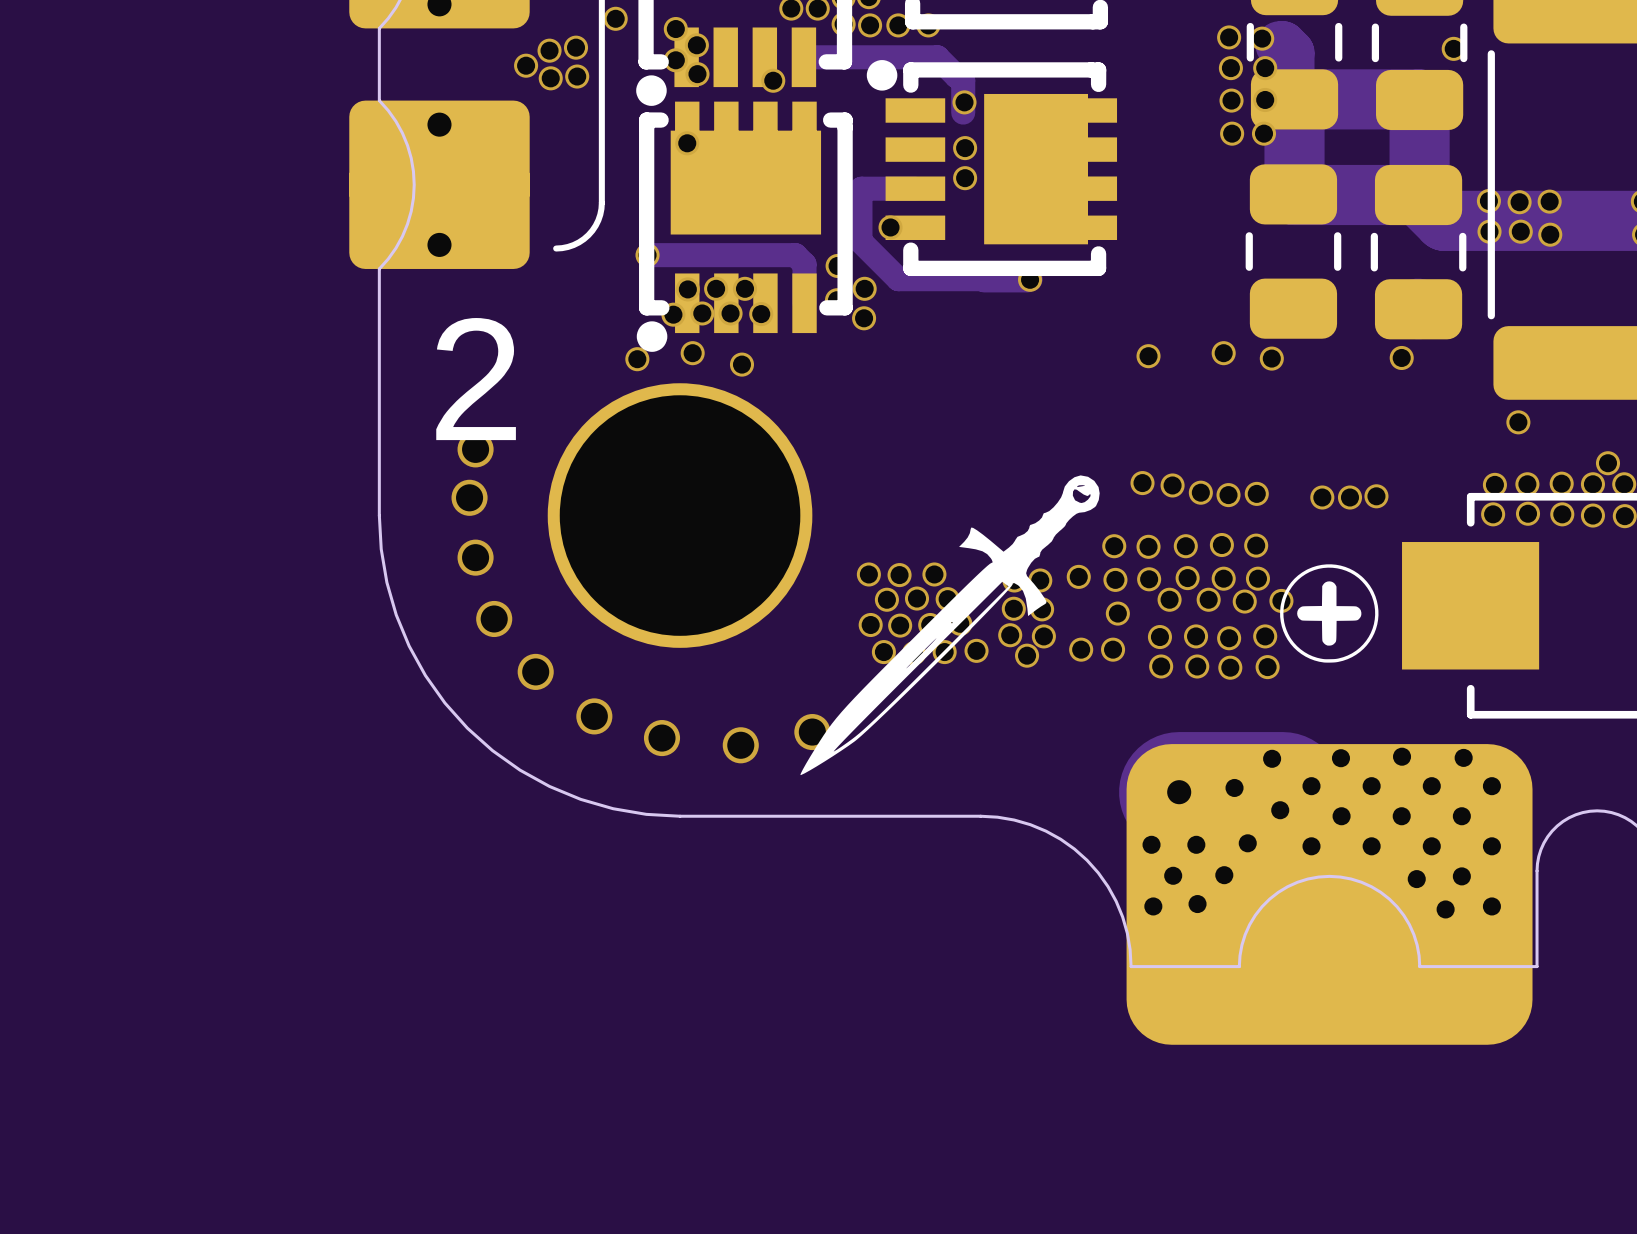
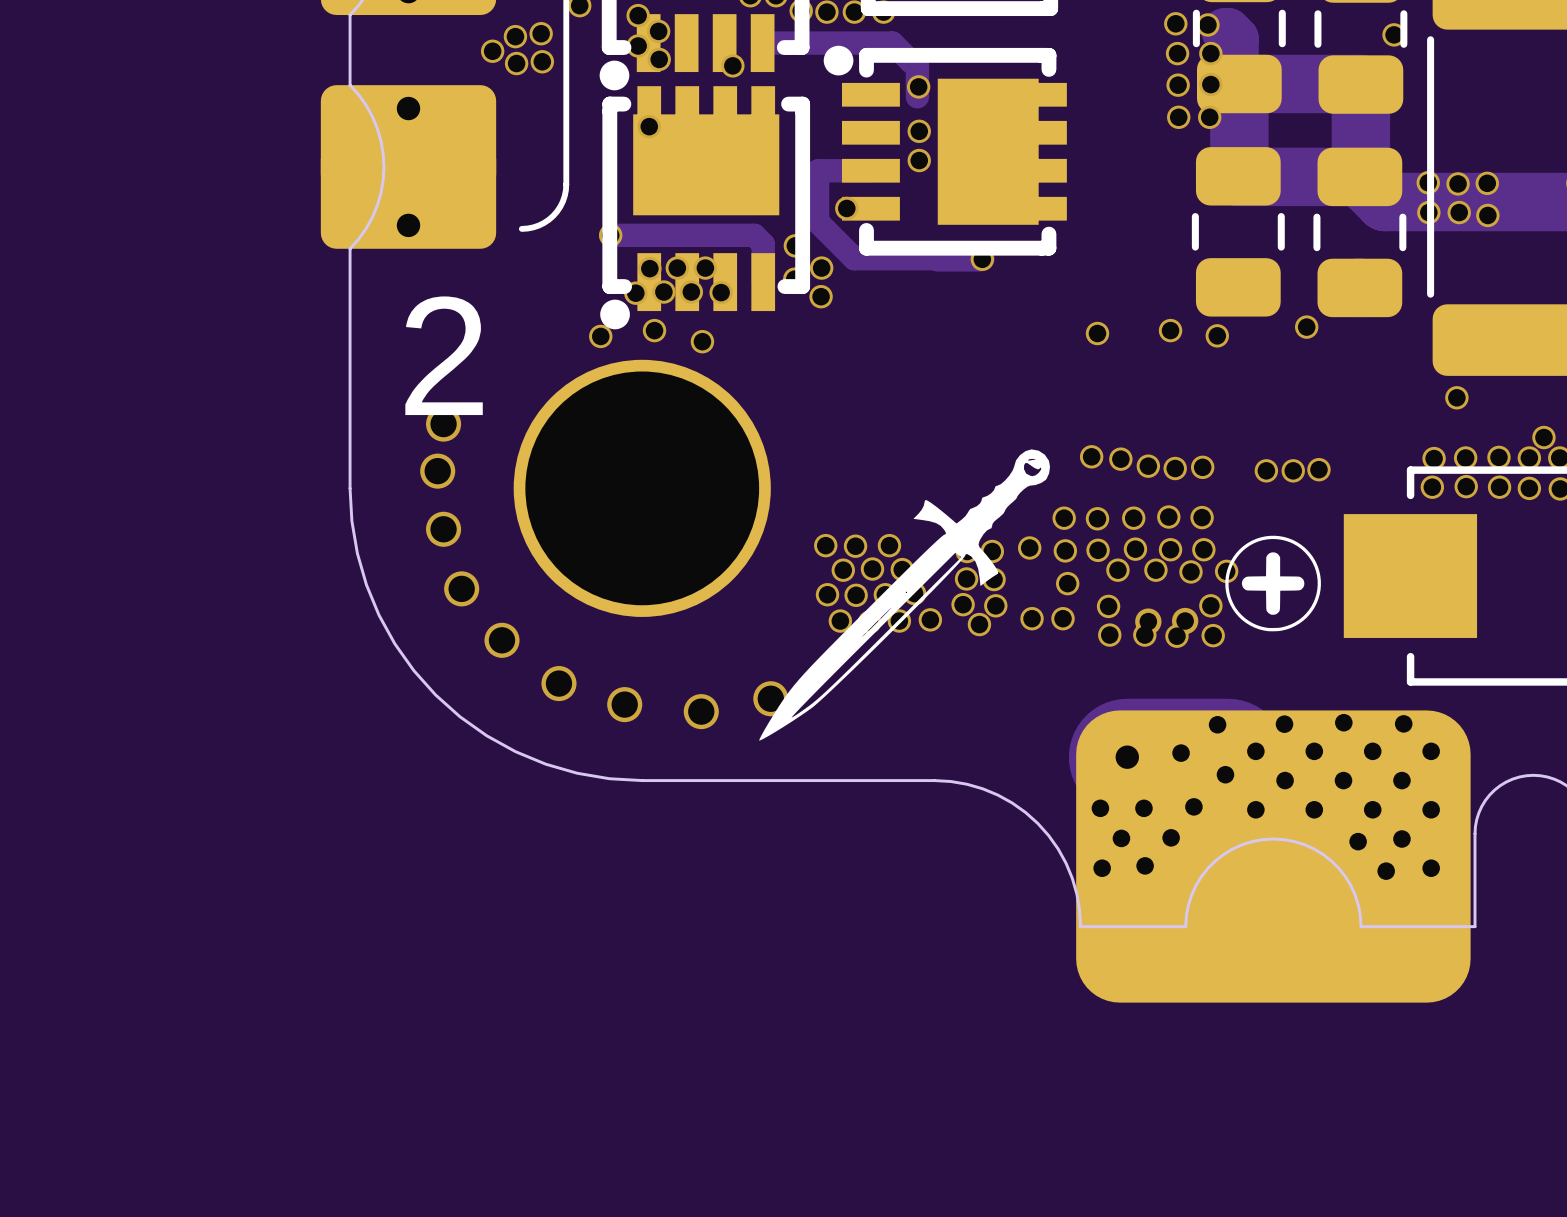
via position: (1401, 357) -> (1306, 327)
via position: (1196, 636) -> (1148, 621)
via position: (1229, 638) -> (1185, 621)

